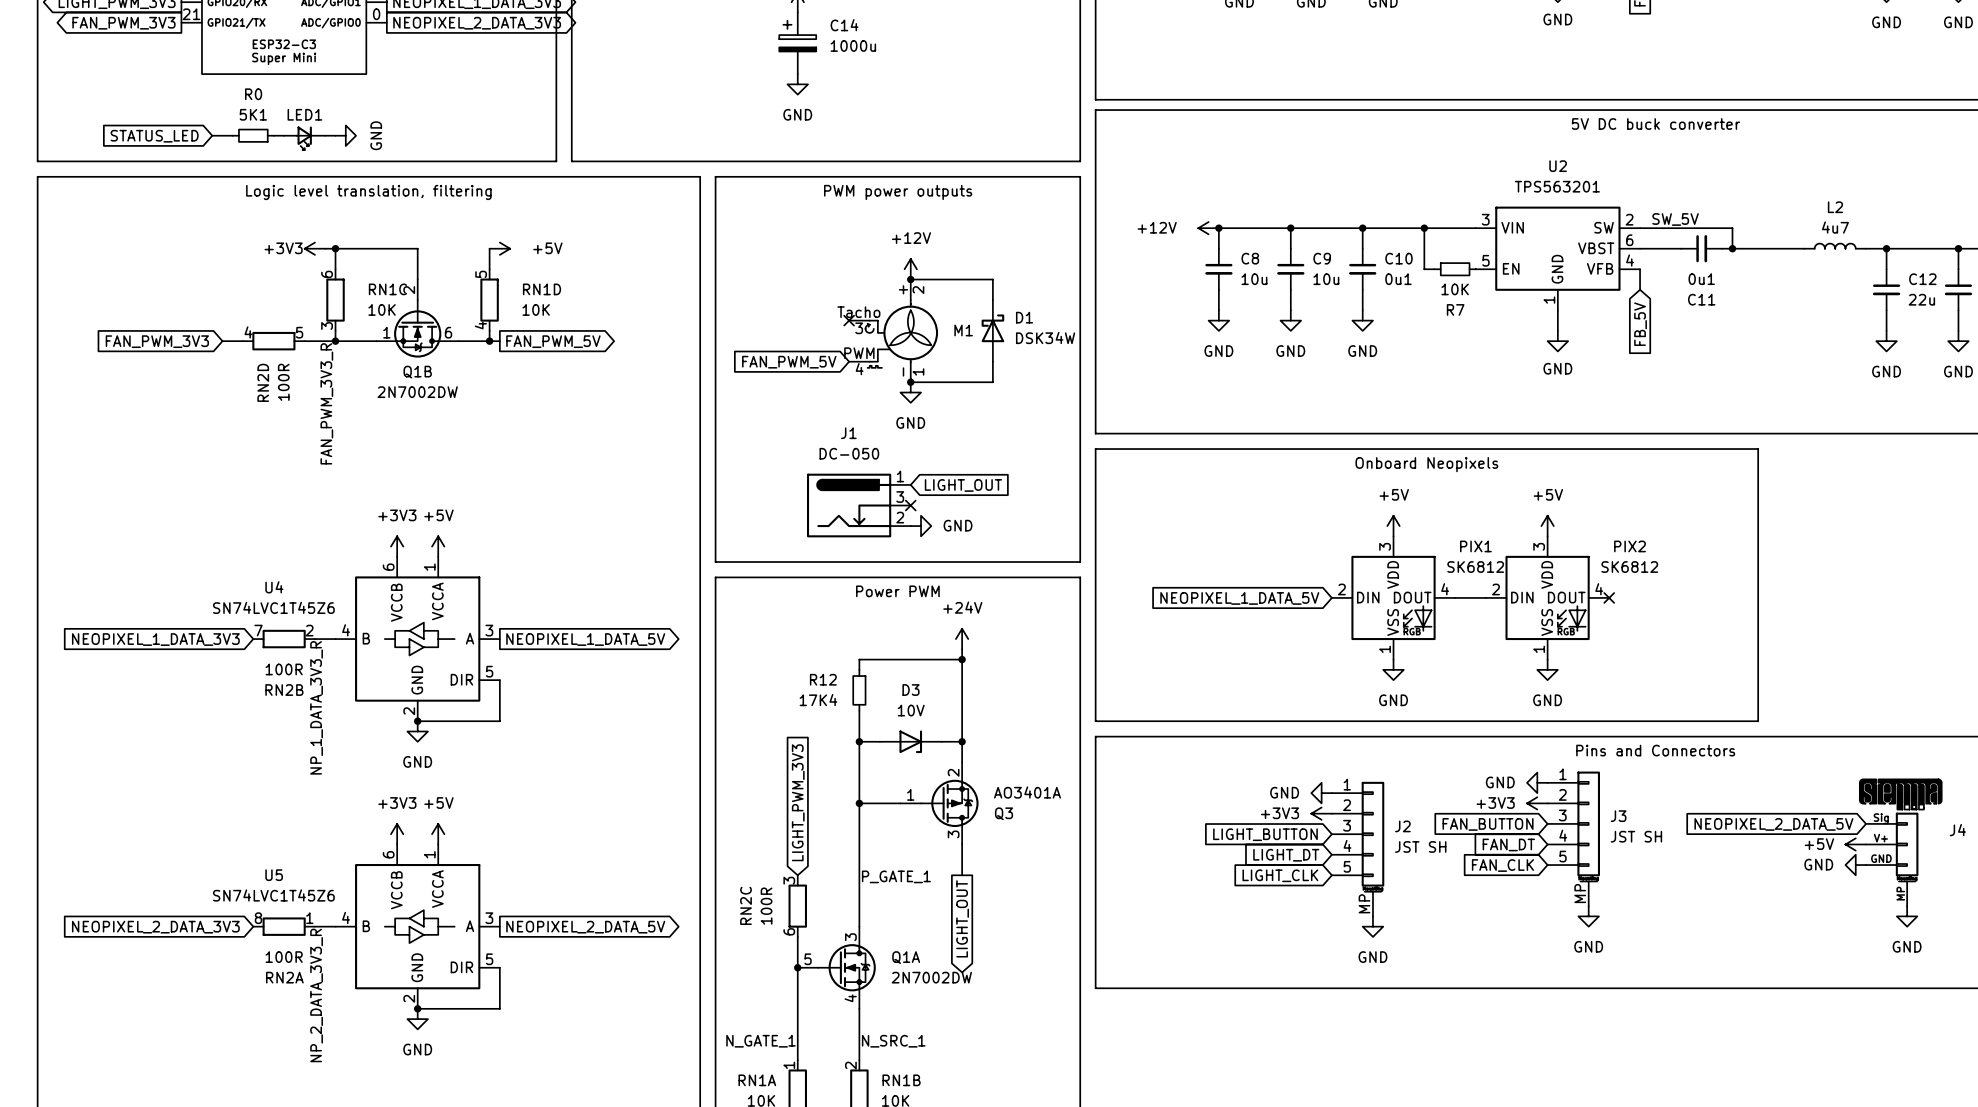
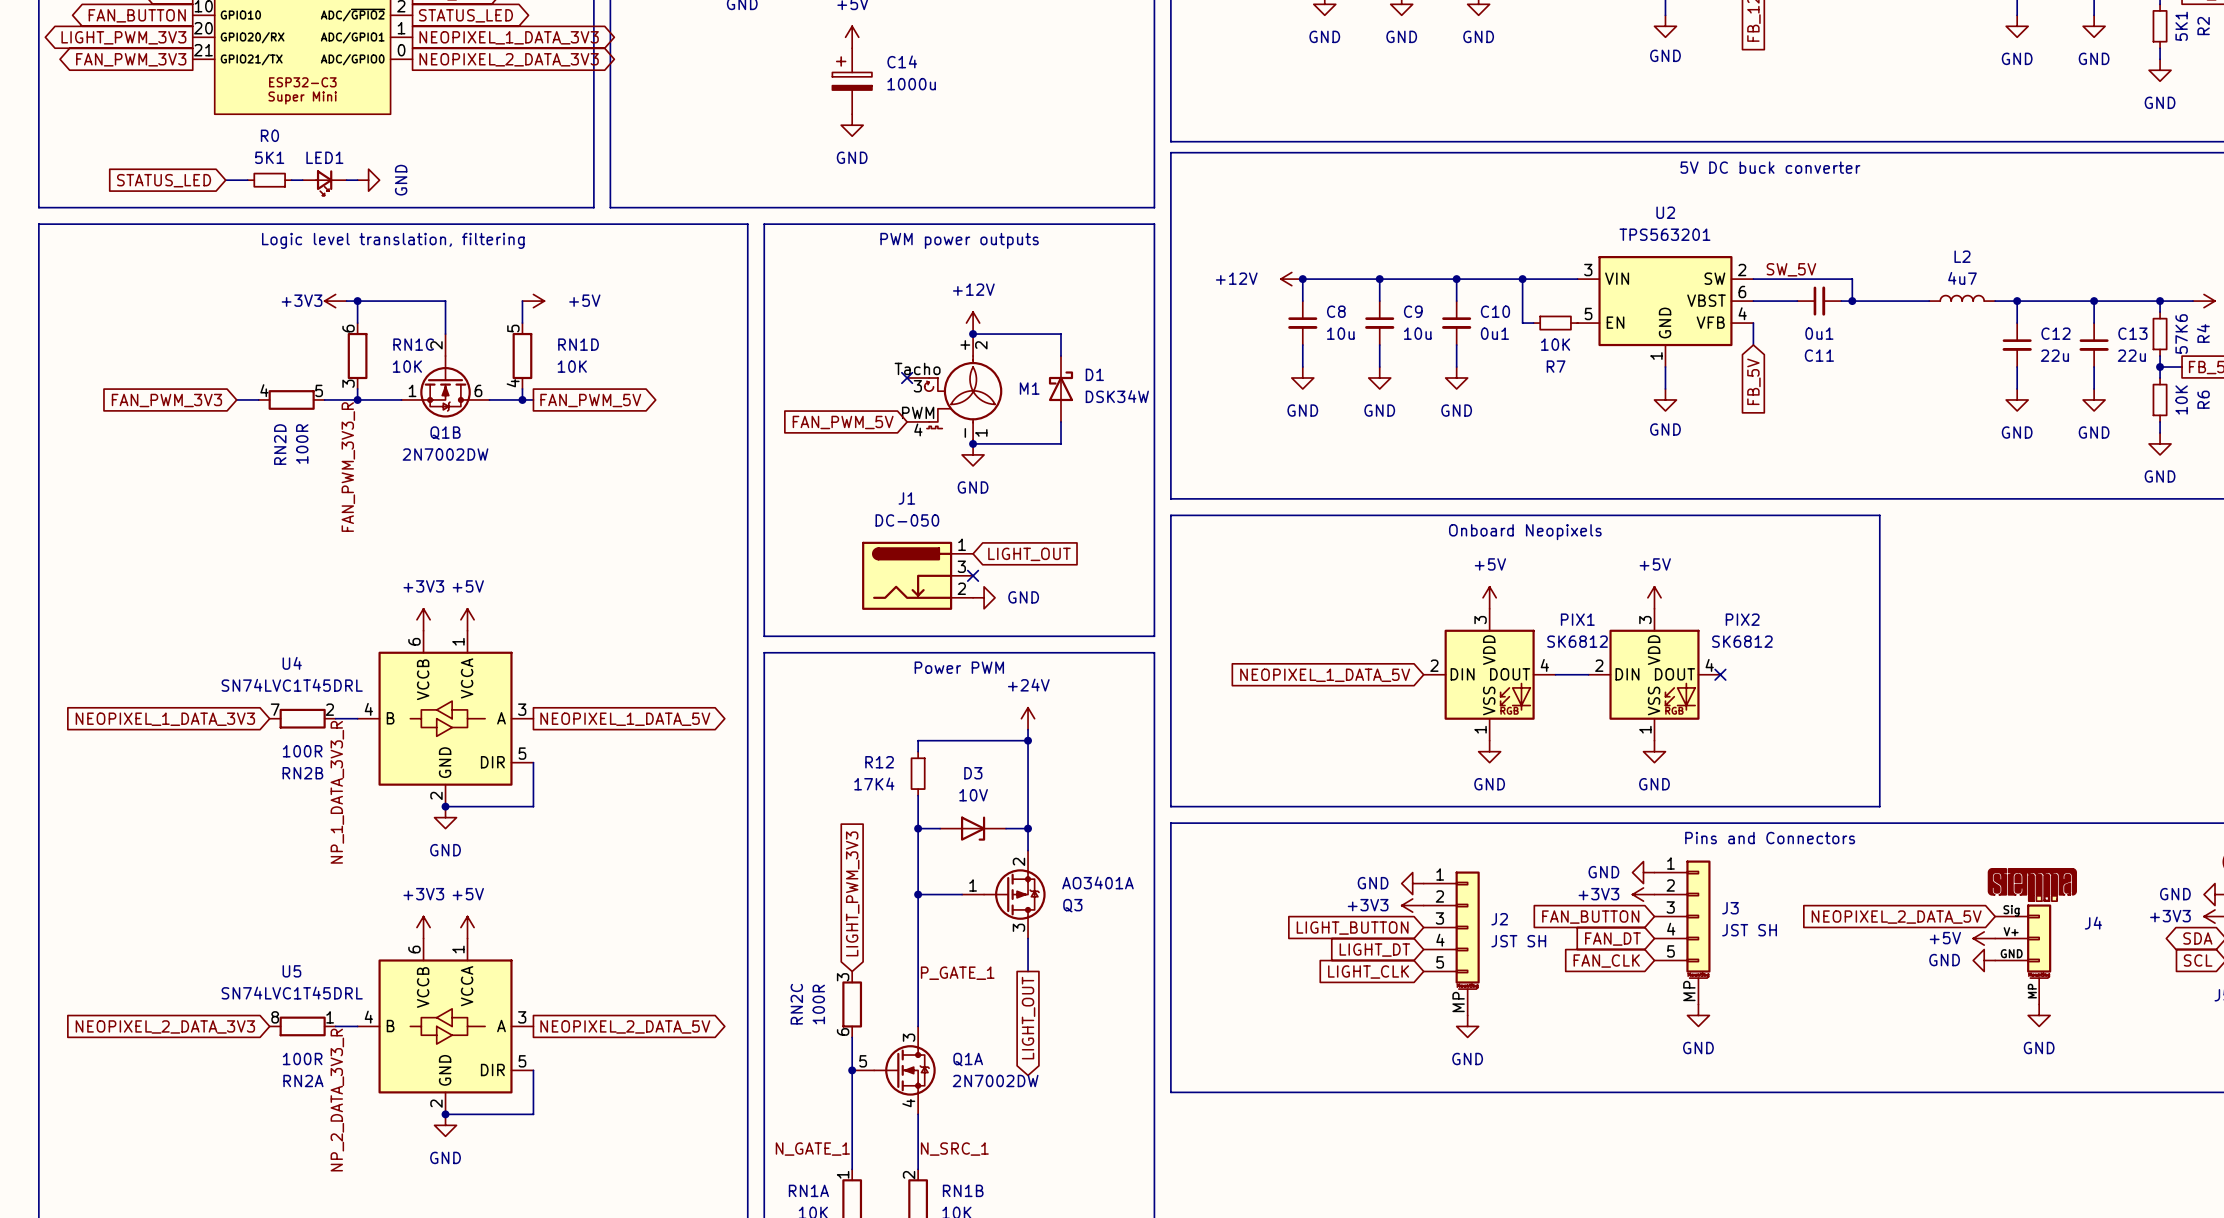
U4 value: SN74LVC1T45Z6 (273, 607) -> SN74LVC1T45DRL (292, 685)
U5 value: SN74LVC1T45Z6 (273, 895) -> SN74LVC1T45DRL (292, 993)

